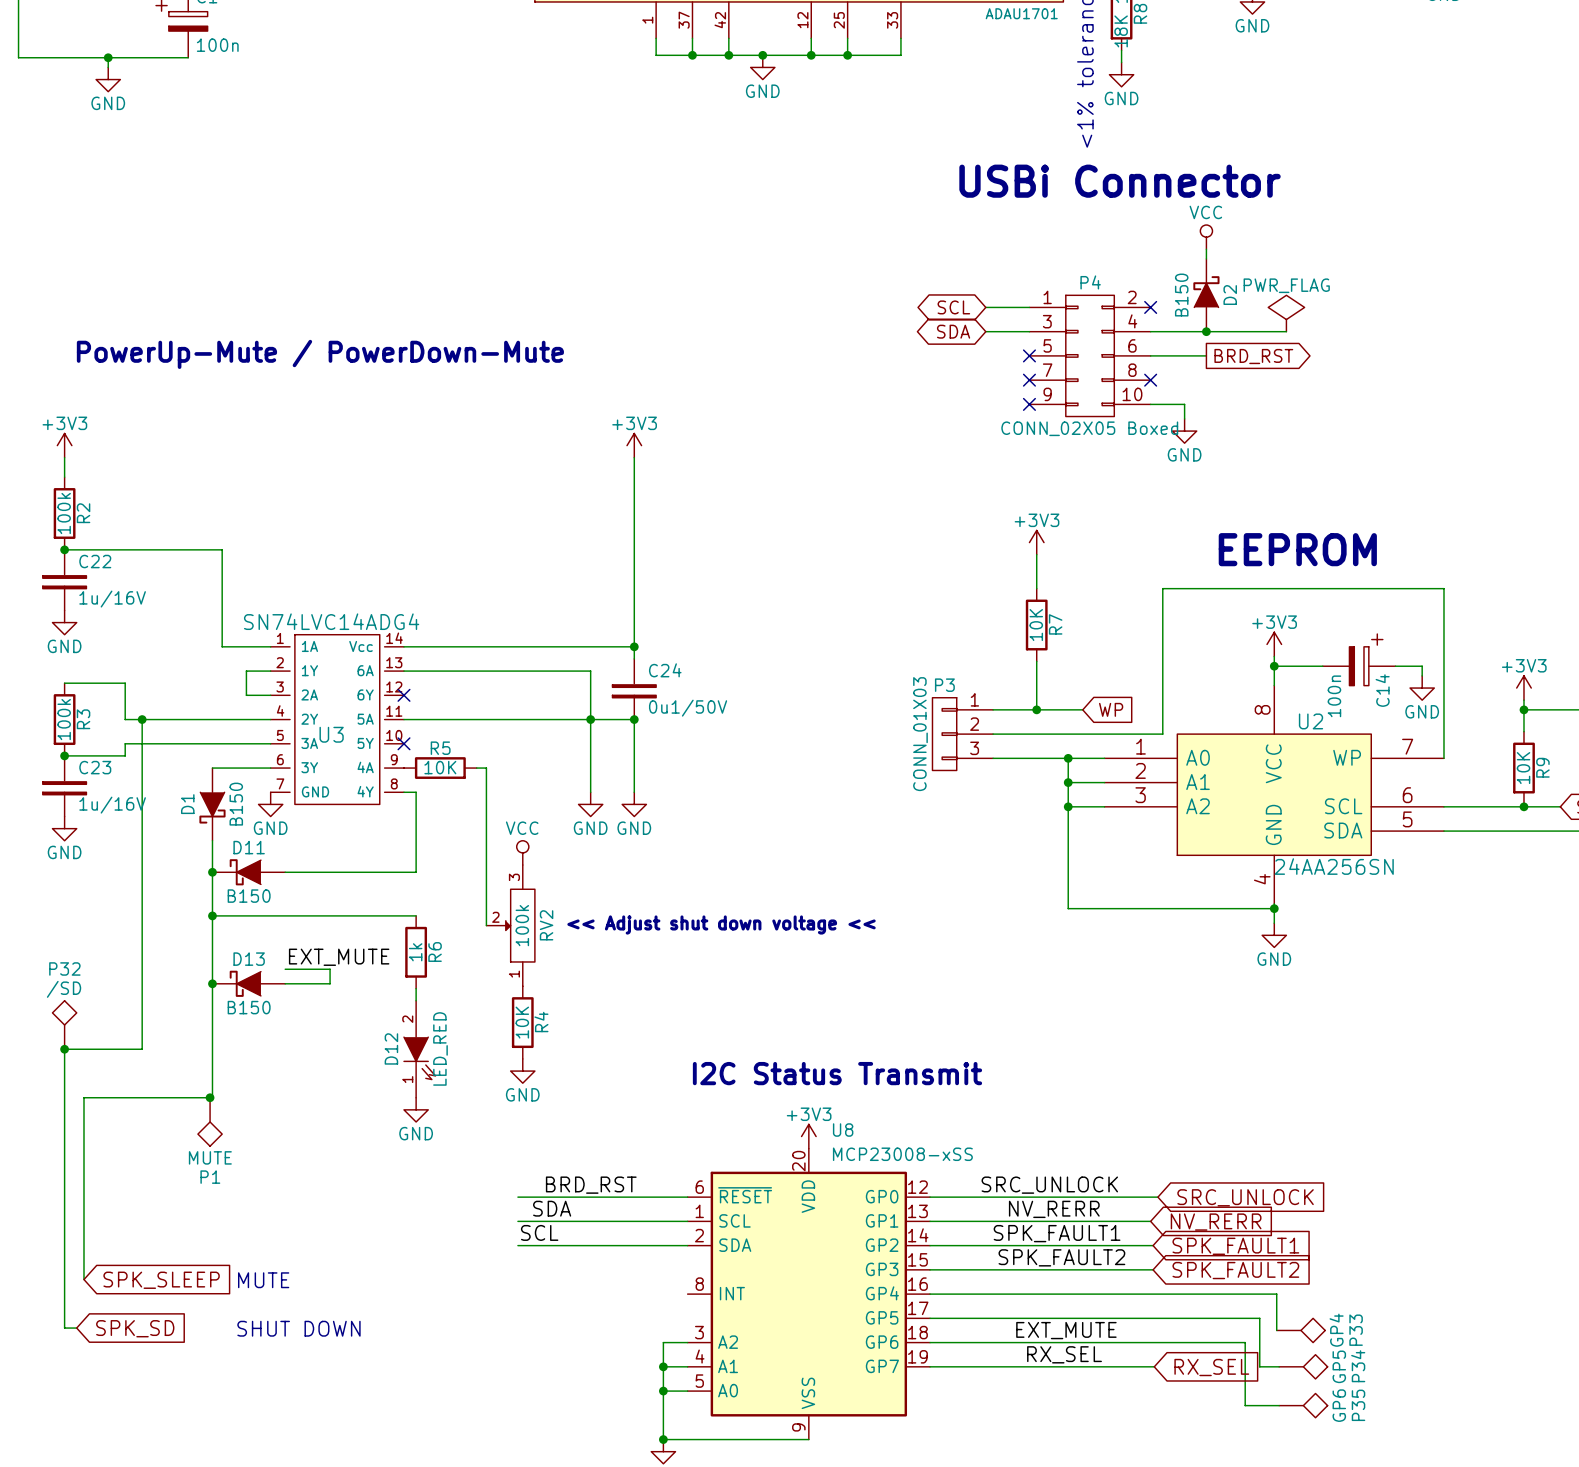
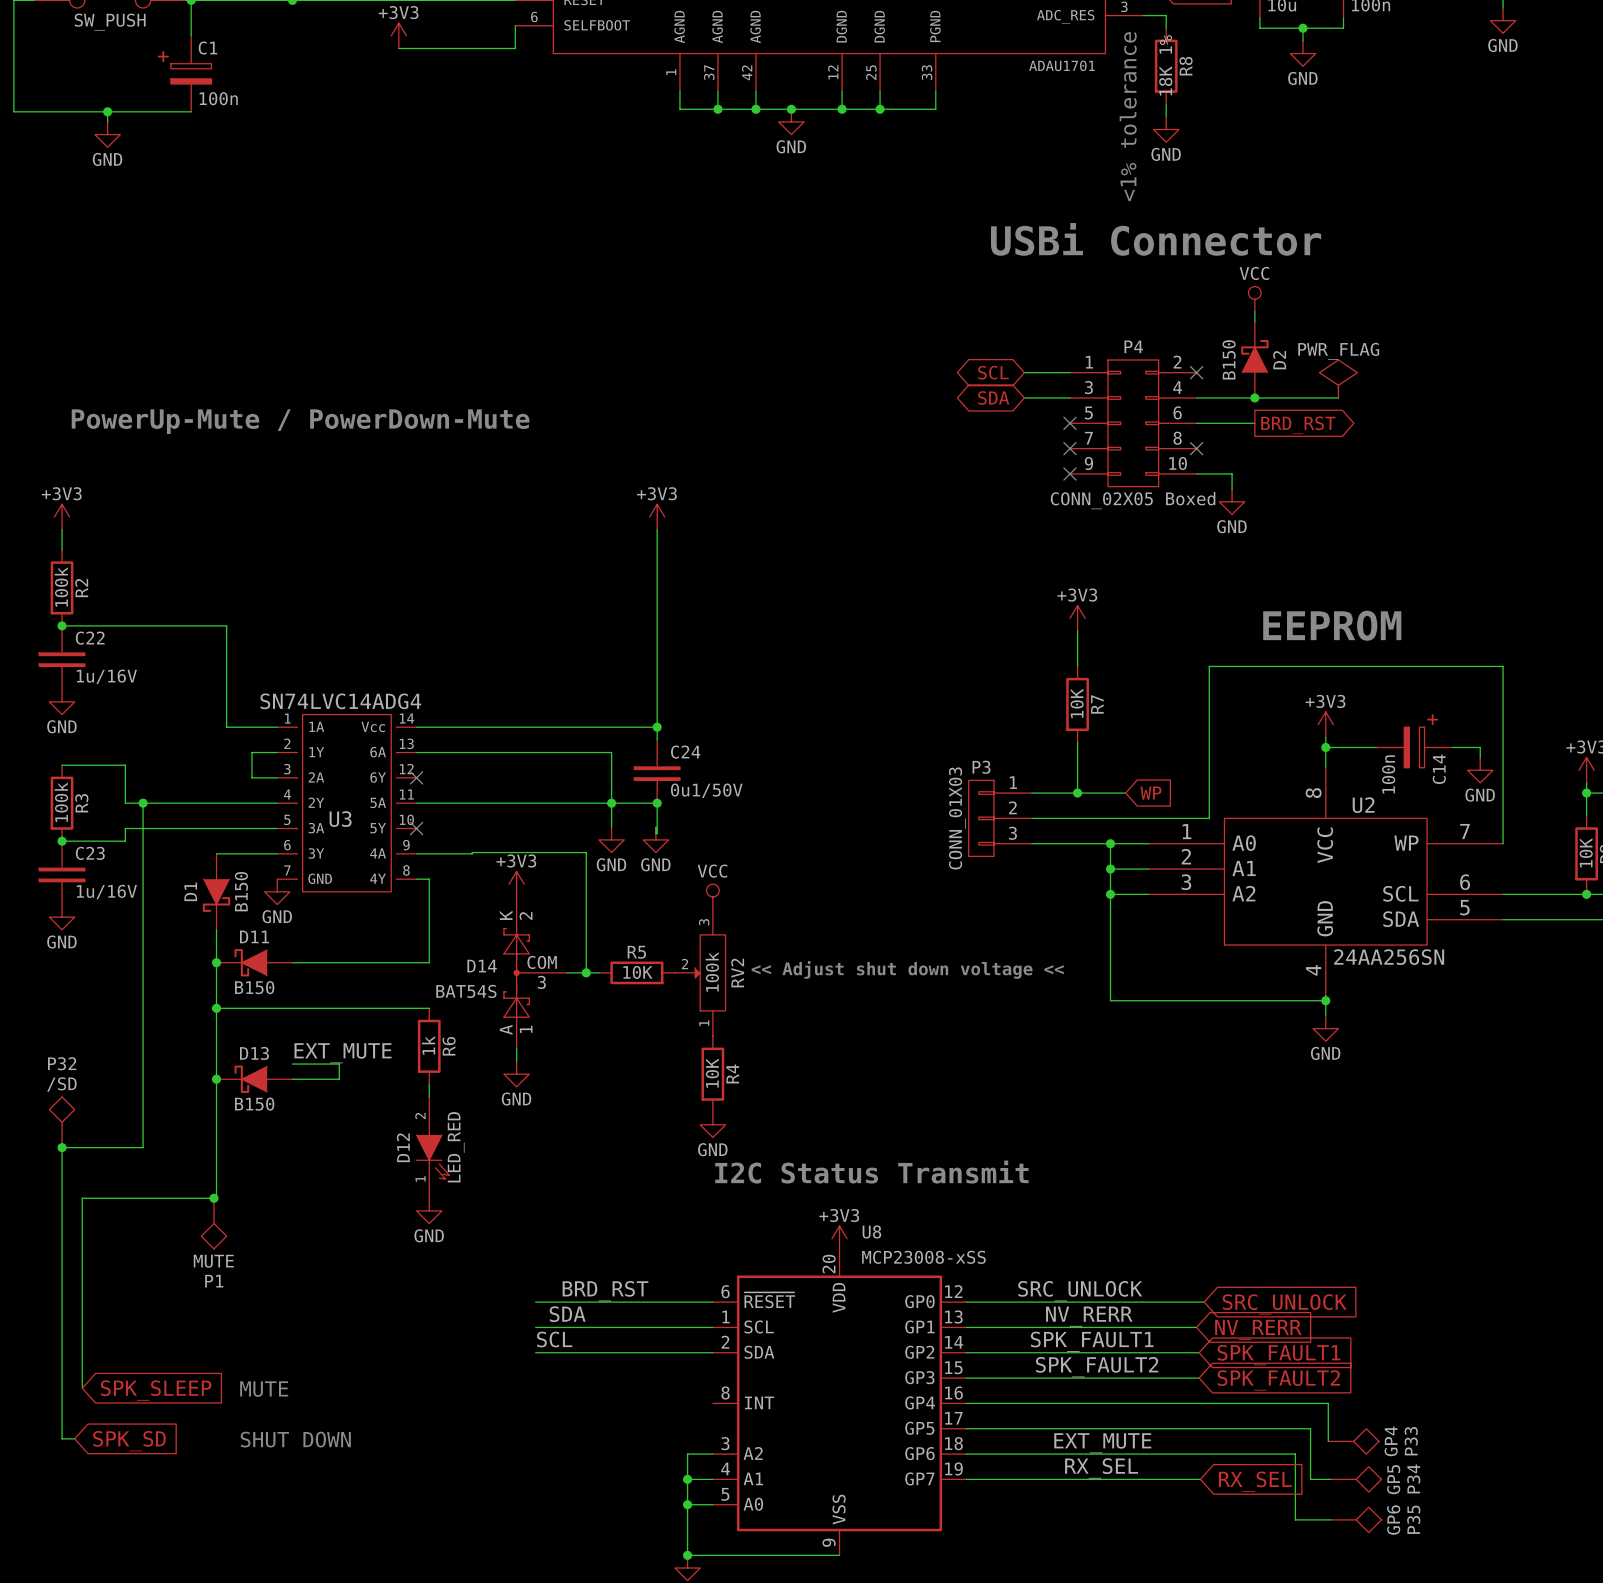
wire: (590, 742) (590, 792) -> none
wire: (634, 748) (634, 792) -> (657, 833) (655, 827)
power symbol: none -> GND (611, 839)
power symbol: none -> GND (655, 839)
wire: none -> (416, 853) (586, 852) (586, 972)
R5 position: (440, 768) -> (636, 972)
wire: (476, 768) (486, 768) (486, 925) -> none
power symbol: none -> +3V3 (516, 884)
power symbol: GND (590, 804) -> none
power symbol: GND (634, 804) -> none
power symbol position: VCC (522, 852) -> VCC (712, 896)
D14: none -> BAT54S (535, 972)
wire: none -> (567, 972) (598, 972)
junction: none -> (586, 972)
text position: << Adjust shut down voltage << (721, 924) -> << Adjust shut down voltage << (907, 969)
RV2 position: (510, 925) -> (700, 972)
wire: none -> (516, 1048) (516, 1061)
power symbol: none -> GND (516, 1074)
R4 position: (522, 1022) -> (712, 1074)
power symbol: none -> GND (712, 1124)
power symbol: GND (522, 1071) -> none

